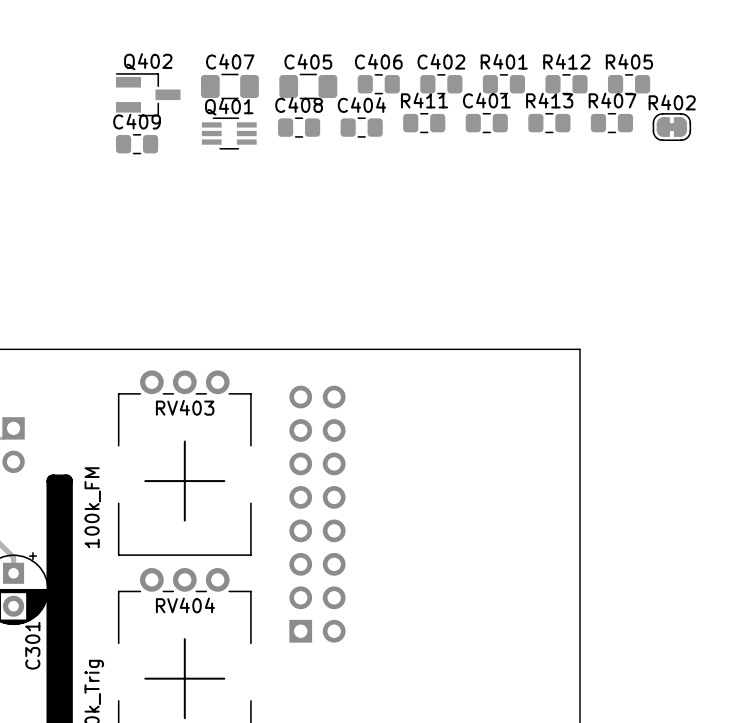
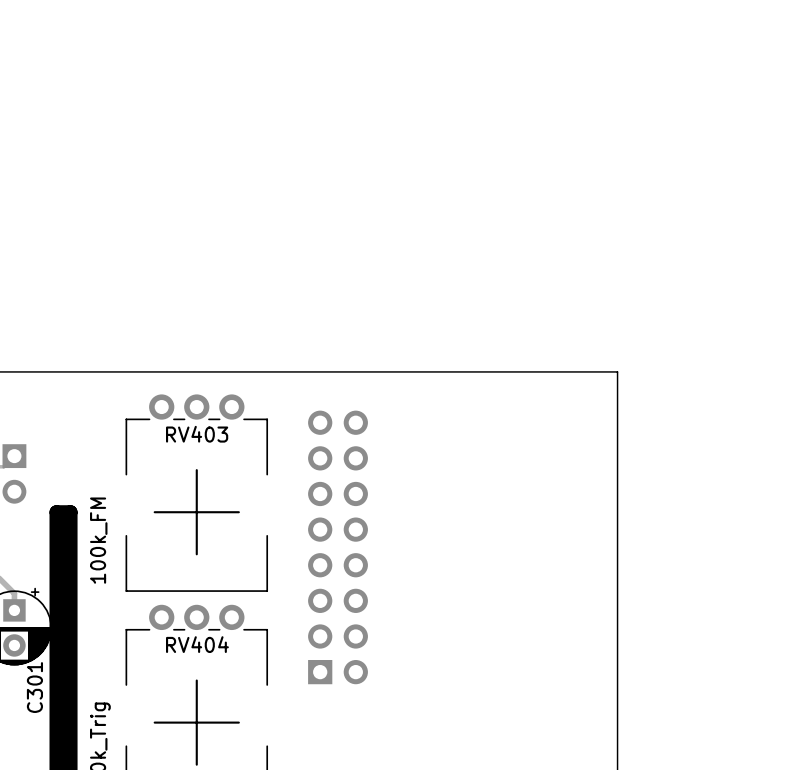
C406: (378, 84) -> none
C402: (441, 84) -> none
R401: (503, 84) -> none
R412: (566, 84) -> none
R405: (629, 84) -> none
C407: (229, 86) -> none
C405: (308, 86) -> none
Q402: (148, 94) -> none
R411: (424, 123) -> none
C401: (486, 123) -> none
R413: (549, 123) -> none
R407: (611, 123) -> none
C408: (299, 127) -> none
C404: (361, 127) -> none
R402: (671, 127) -> none
Q401: (229, 133) -> none
C409: (137, 144) -> none

